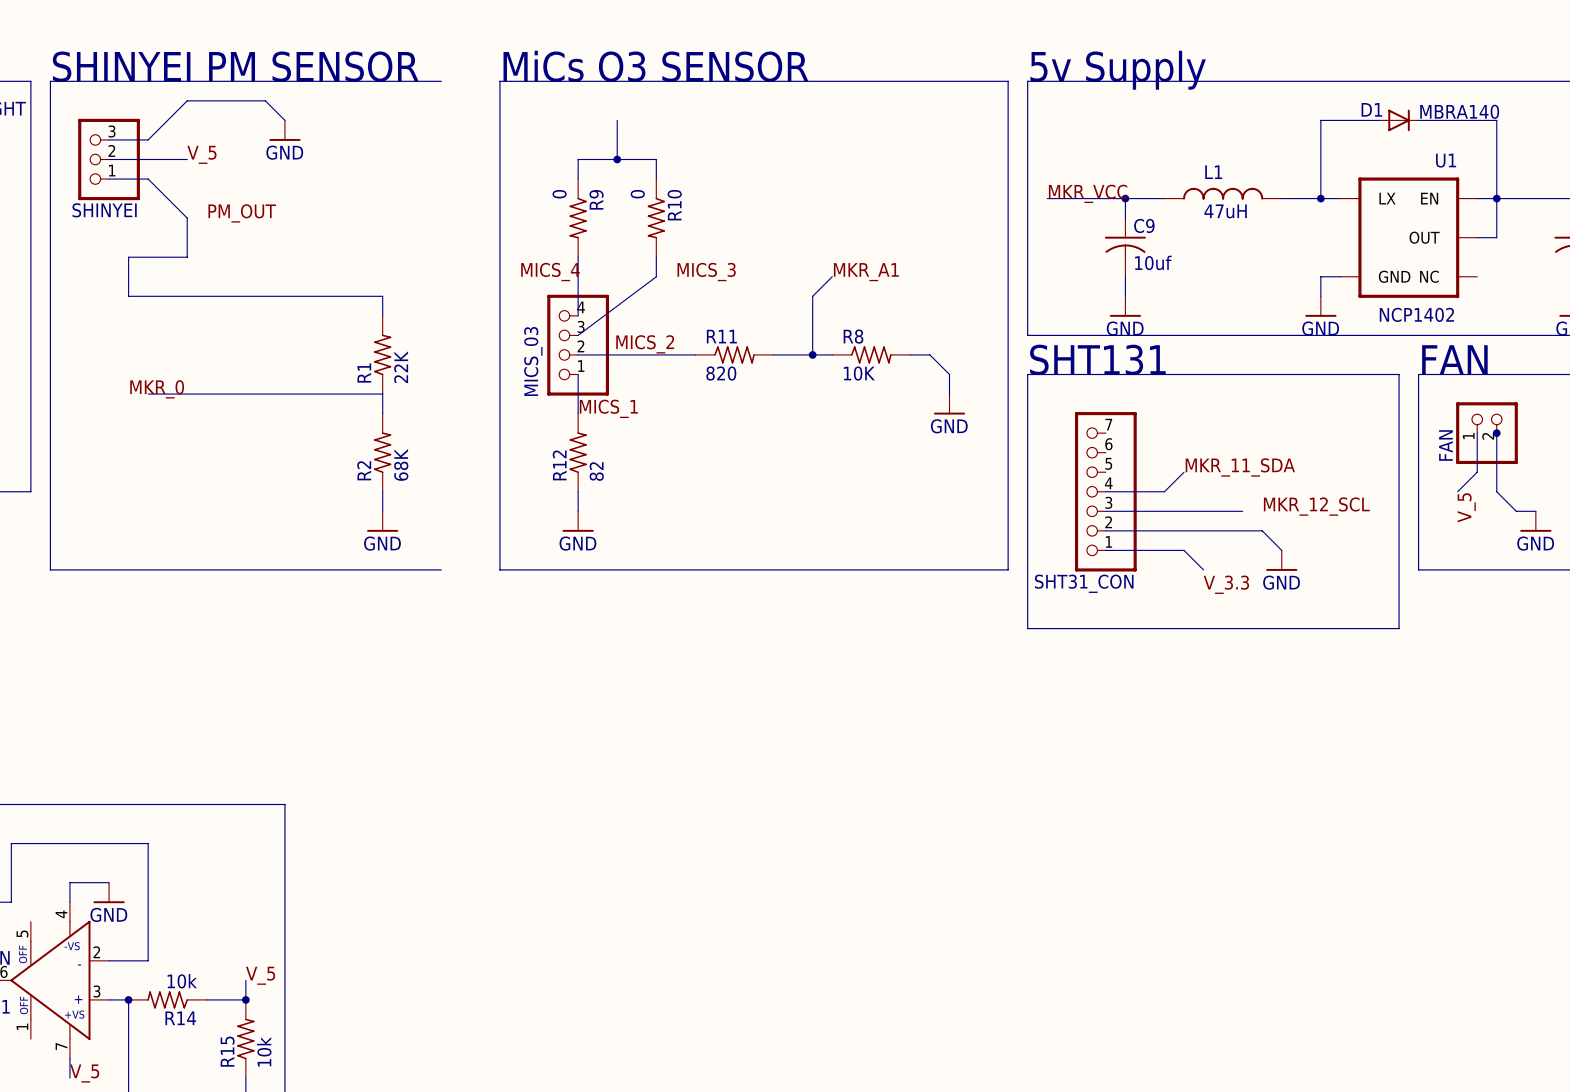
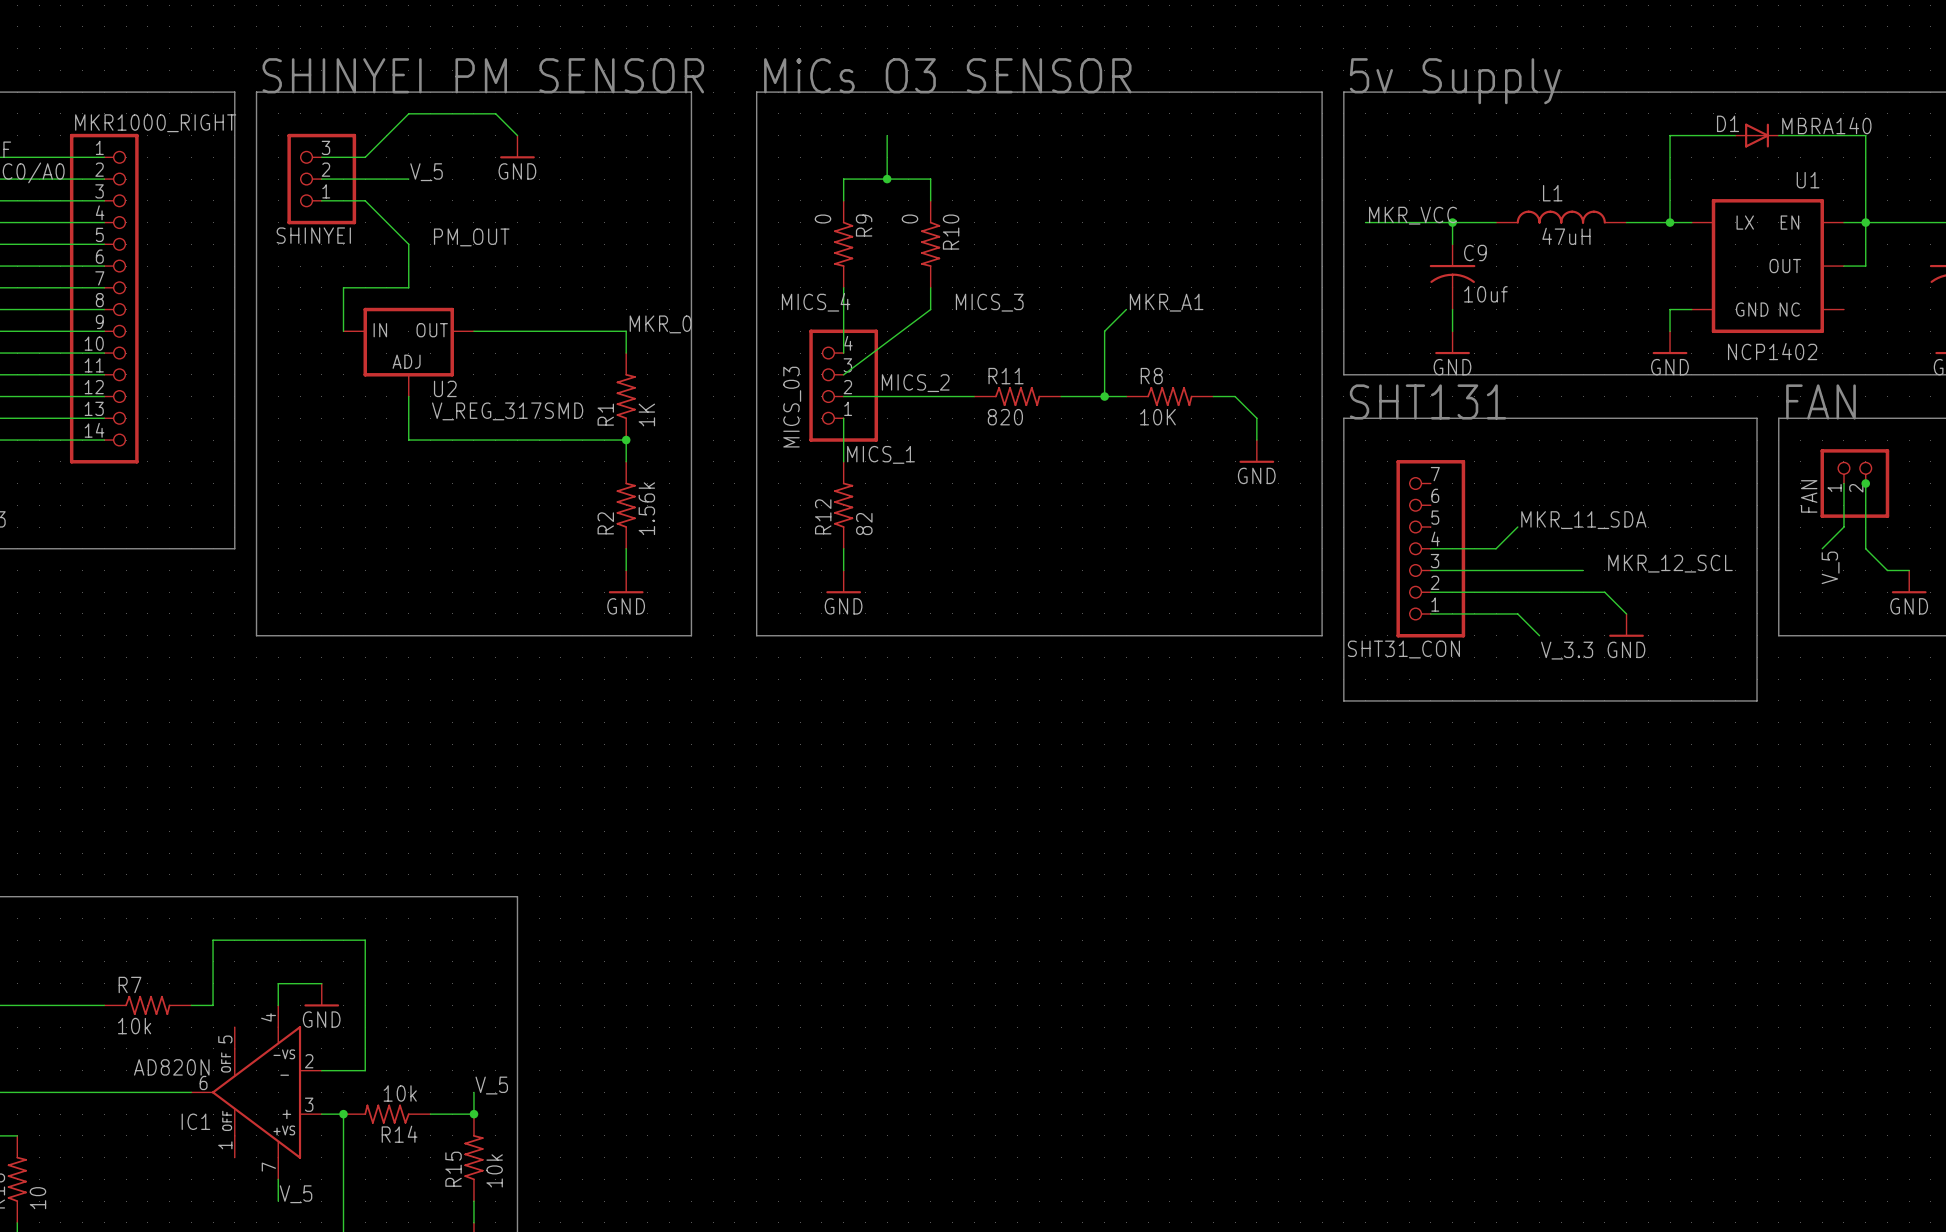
line: none -> (691, 92) (691, 635)
label: none -> MKR_0 (660, 324)
wire: (128, 296) (245, 296) -> none
U2: none -> V_REG_317SMD (408, 352)
R1 value: 22K (401, 367) -> 1K (646, 414)
label: MKR_0 (157, 389) -> none
wire: (148, 394) (187, 394) -> (408, 396) (408, 440)
junction: none -> (626, 440)
R2 value: 68K (401, 464) -> 1.56k (646, 508)

